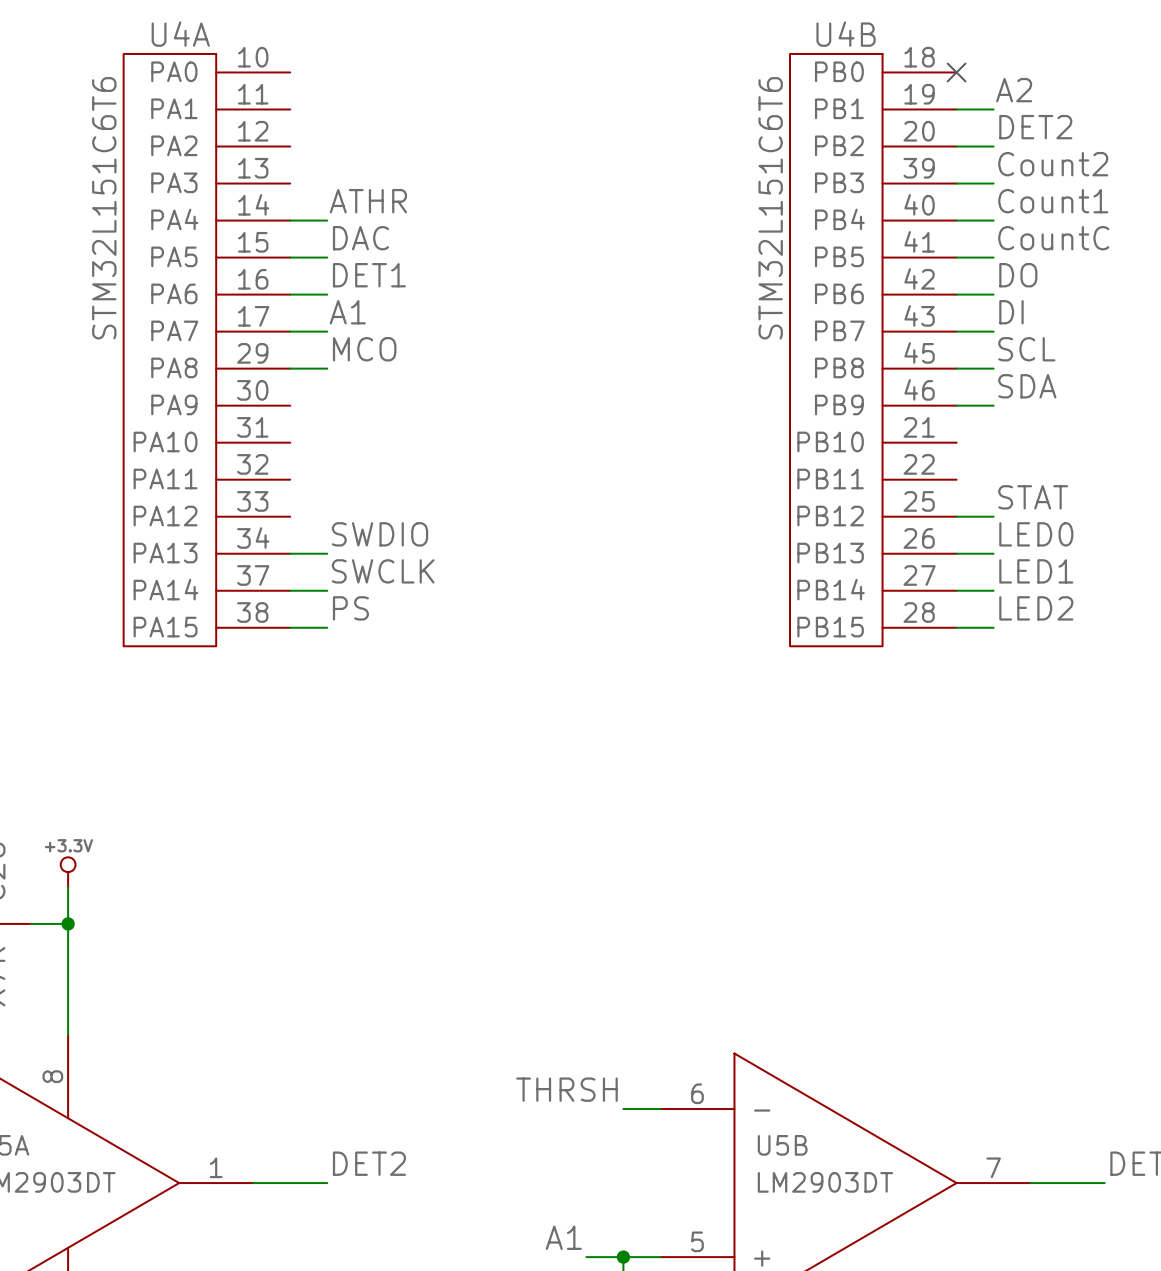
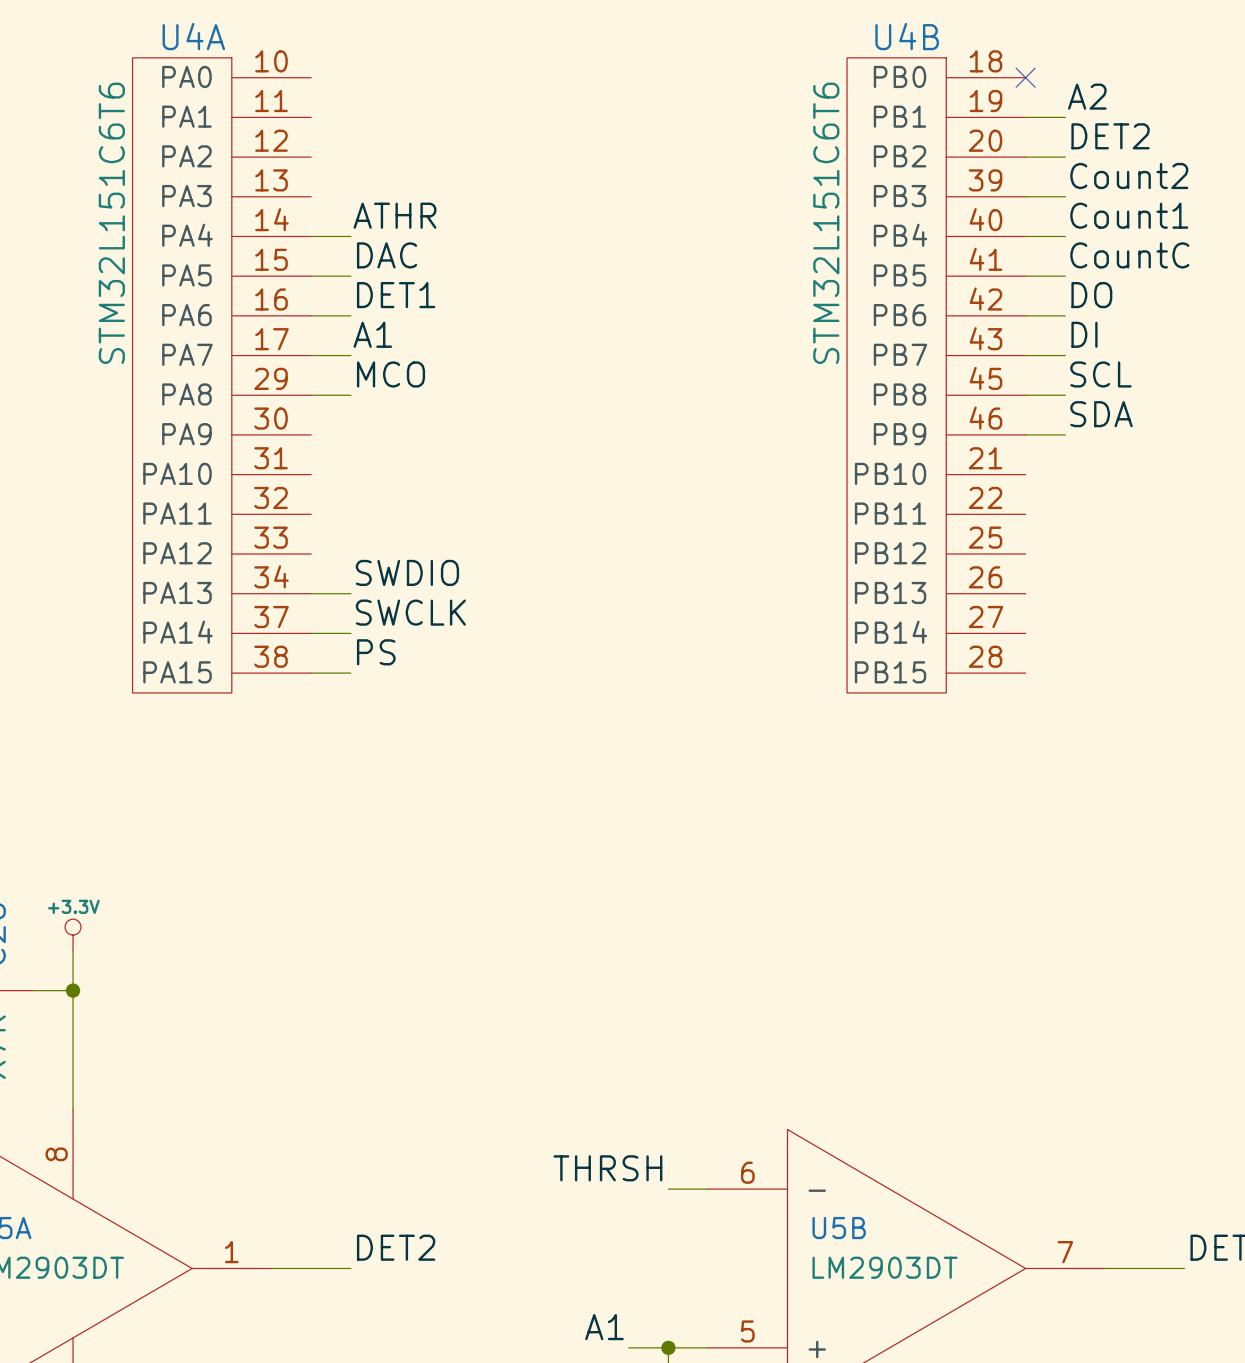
label: STAT (1033, 497) -> none
wire: (956, 516) (993, 516) -> none
label: LED0 (1036, 534) -> none
wire: (956, 553) (993, 553) -> none
label: LED1 (1036, 571) -> none
wire: (956, 590) (993, 590) -> none
label: LED2 (1036, 608) -> none
wire: (956, 627) (993, 627) -> none

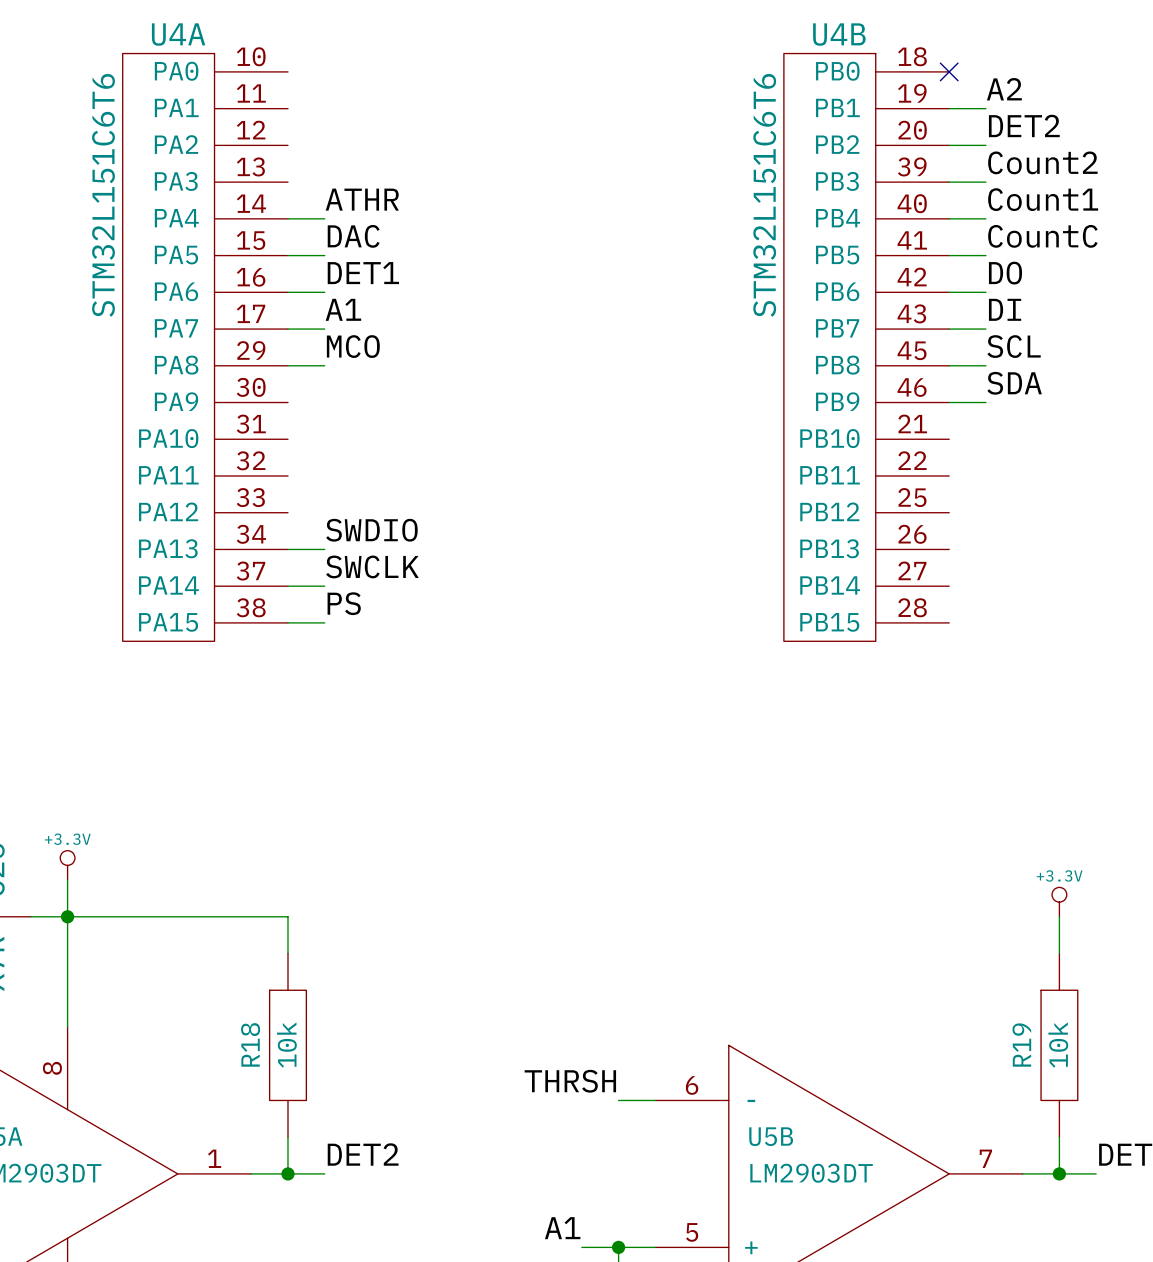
power symbol: none -> +3.3V (1059, 902)
wire: none -> (67, 916) (287, 916) (287, 953)
wire: none -> (1059, 916) (1059, 953)
R18: none -> 10k (287, 1045)
R19: none -> 10k (1059, 1045)
wire: none -> (287, 1137) (287, 1173)
wire: none -> (1059, 1137) (1059, 1173)
junction: none -> (287, 1173)
junction: none -> (1059, 1173)

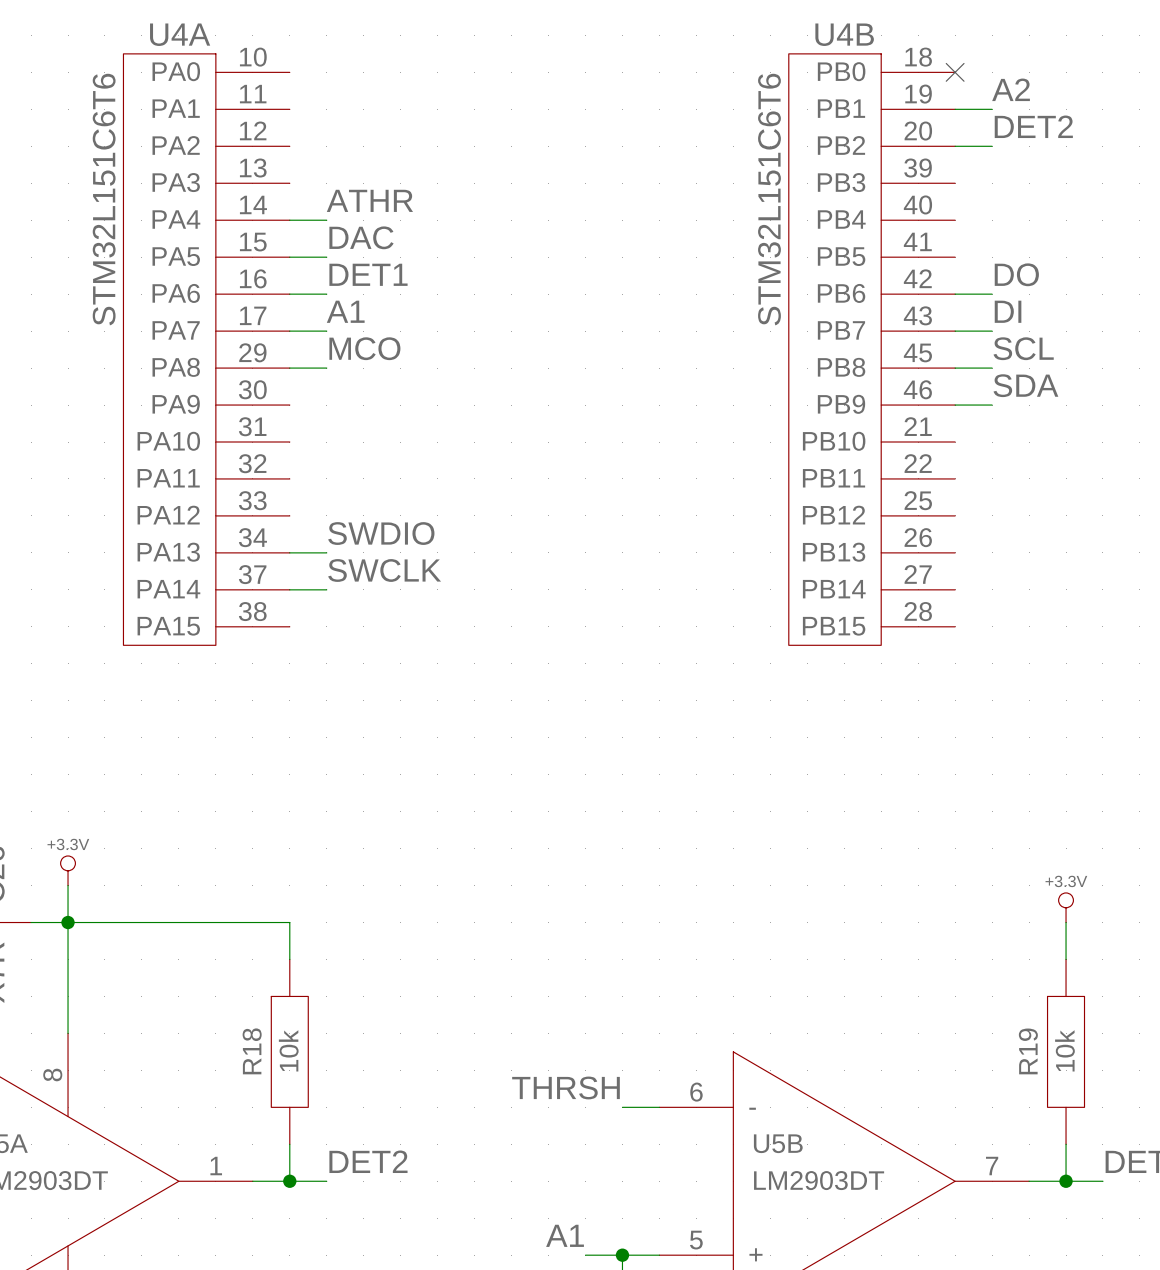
label: Count2 (1042, 162) -> none
wire: (949, 182) (985, 182) -> none
label: Count1 (1043, 199) -> none
wire: (949, 218) (985, 218) -> none
label: CountC (1042, 236) -> none
wire: (949, 255) (985, 255) -> none
label: PS (344, 603) -> none
wire: (287, 622) (324, 622) -> none

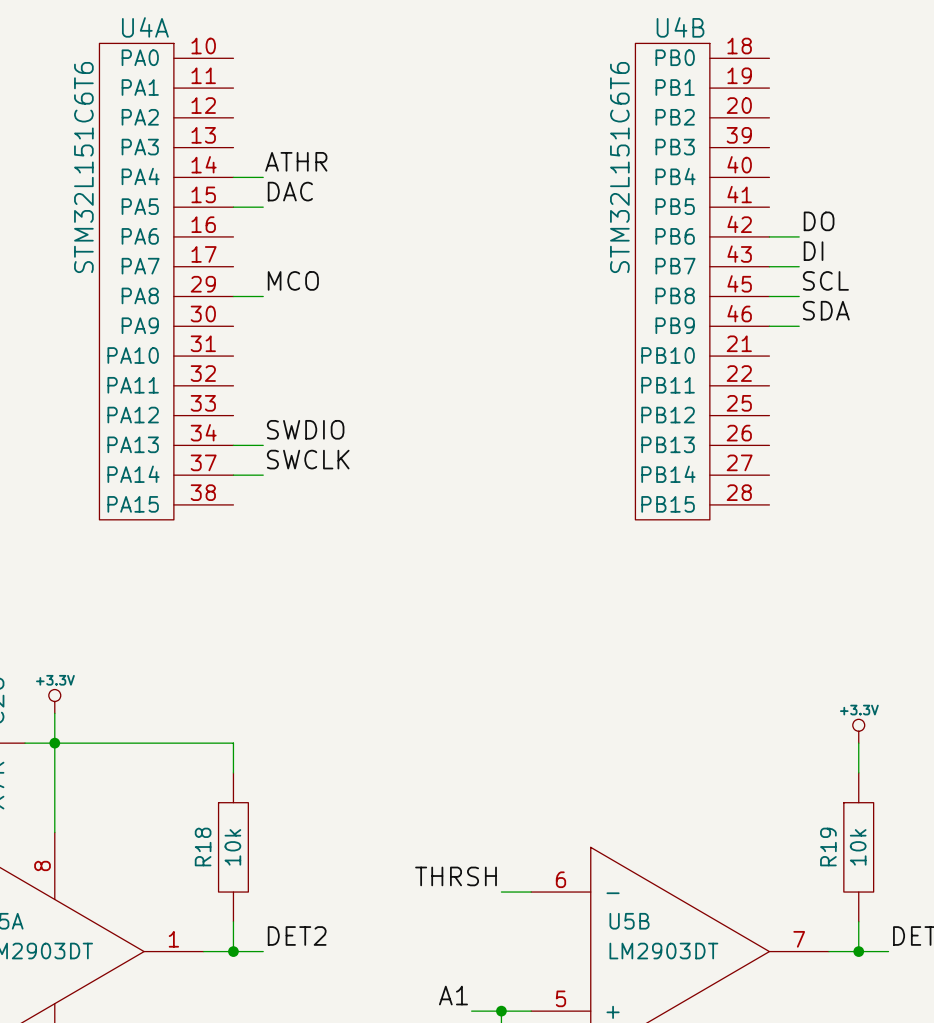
no-connect mark: (955, 72) -> none
label: A2 (1011, 89) -> none
wire: (955, 109) (992, 109) -> none
label: DET2 (1033, 126) -> none
wire: (955, 146) (992, 146) -> none
label: DET1 (368, 274) -> none
wire: (289, 294) (326, 294) -> none
label: A1 (345, 311) -> none
wire: (289, 331) (326, 331) -> none

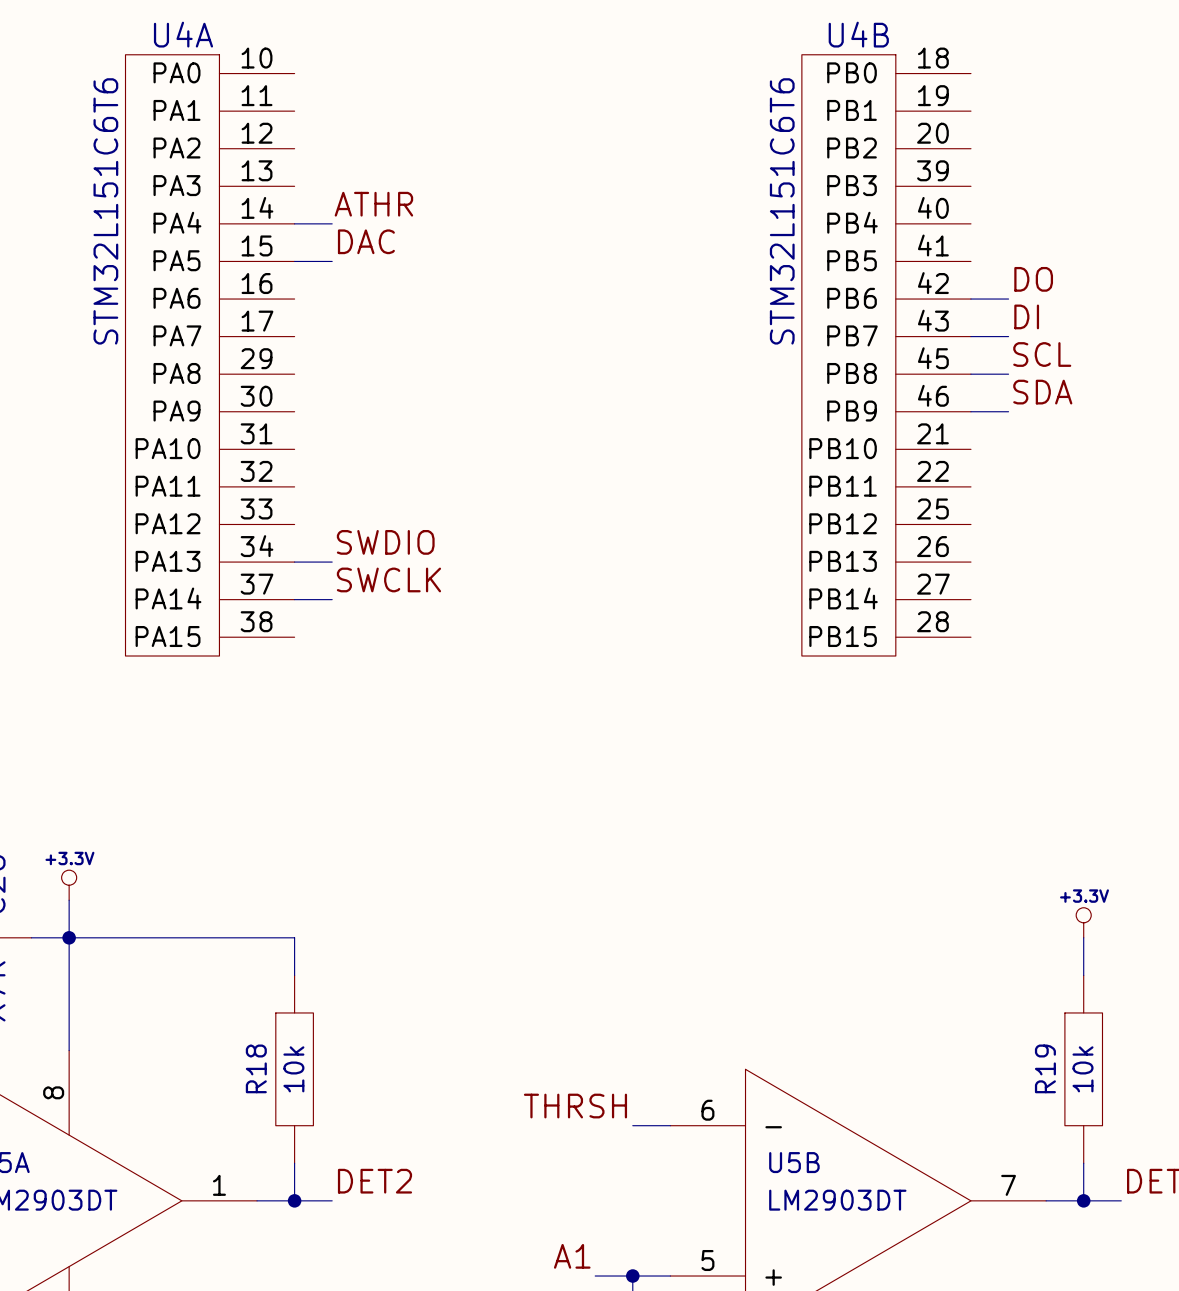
label: MCO (293, 280) -> none
wire: (233, 296) (263, 296) -> none

